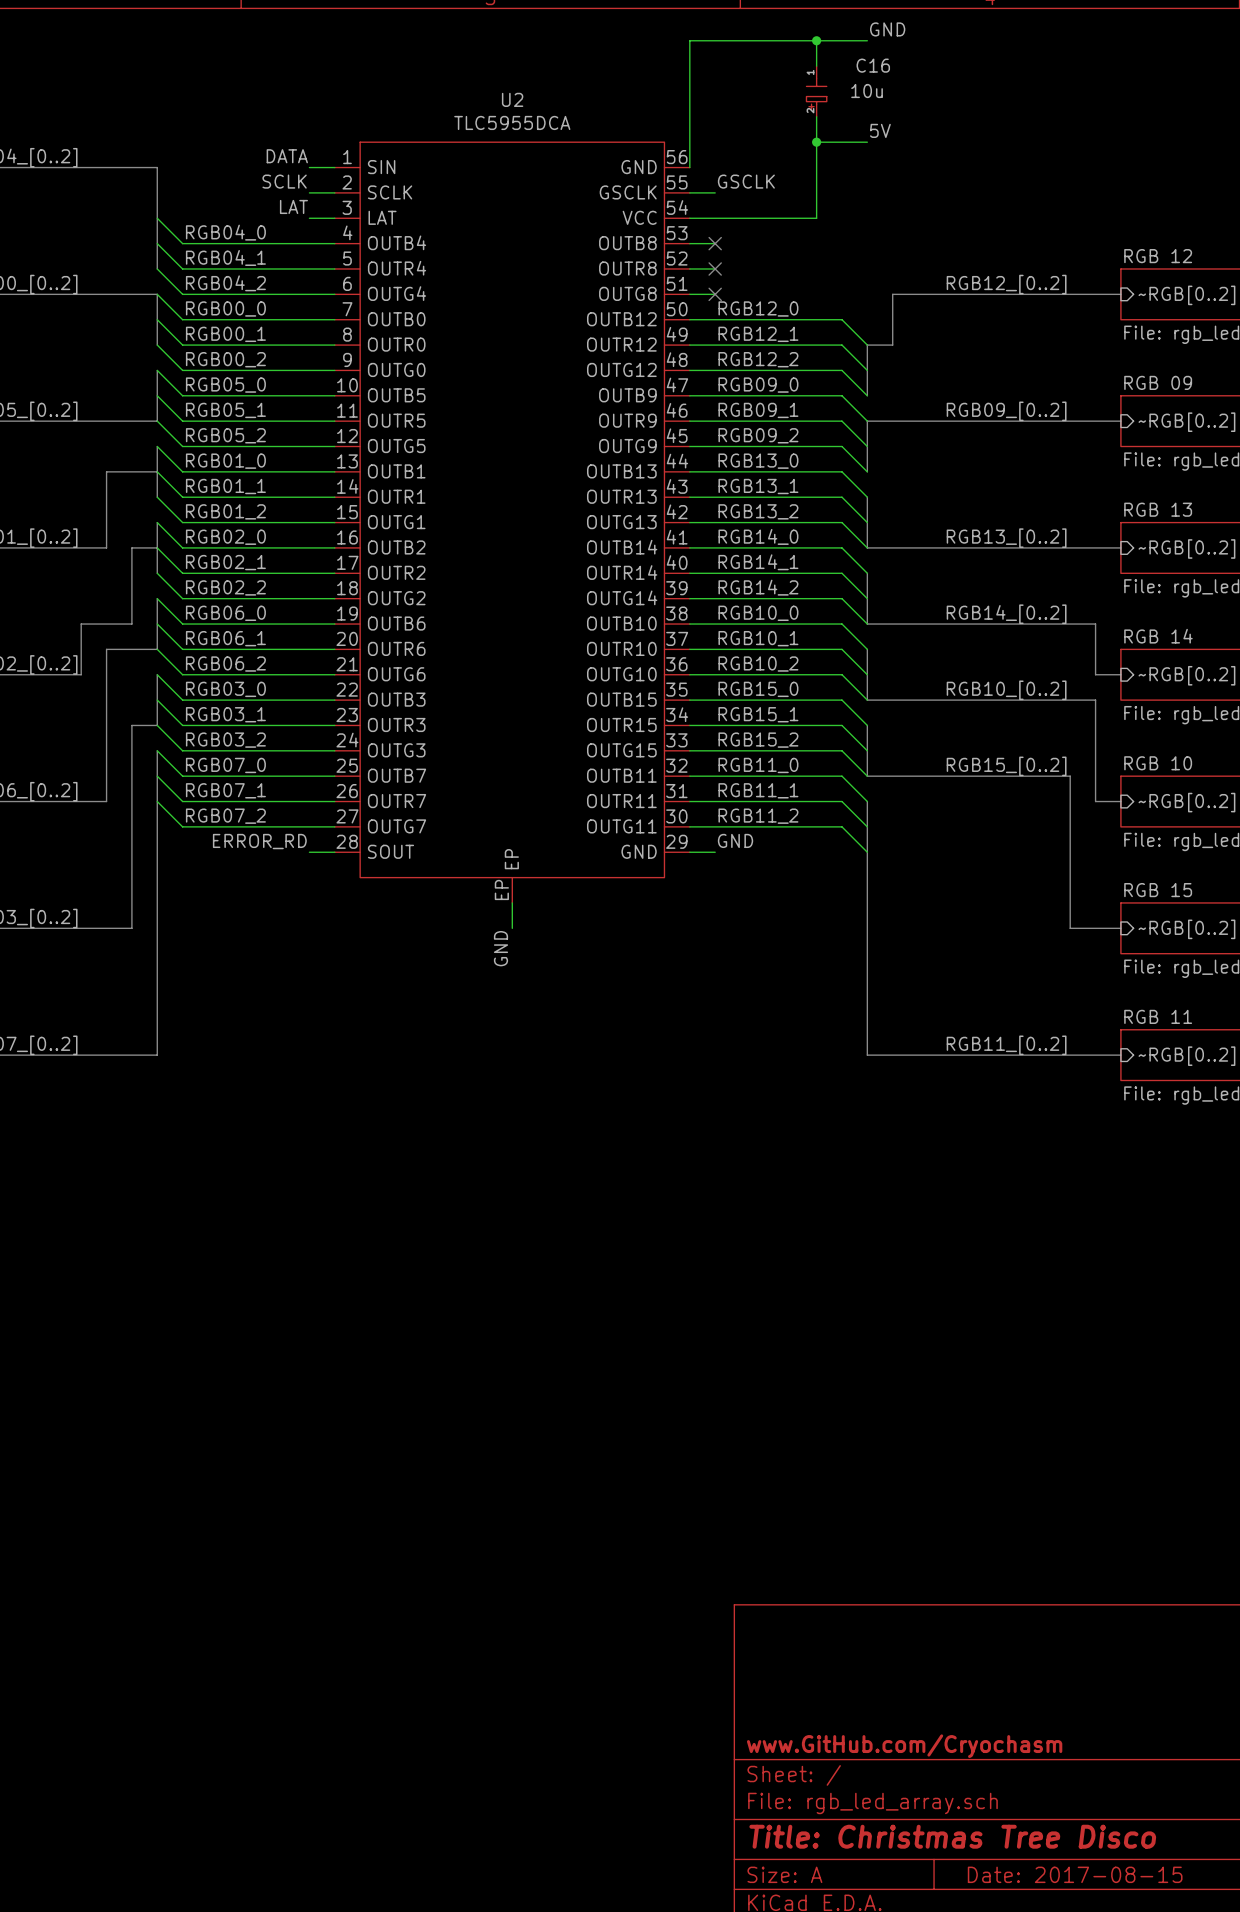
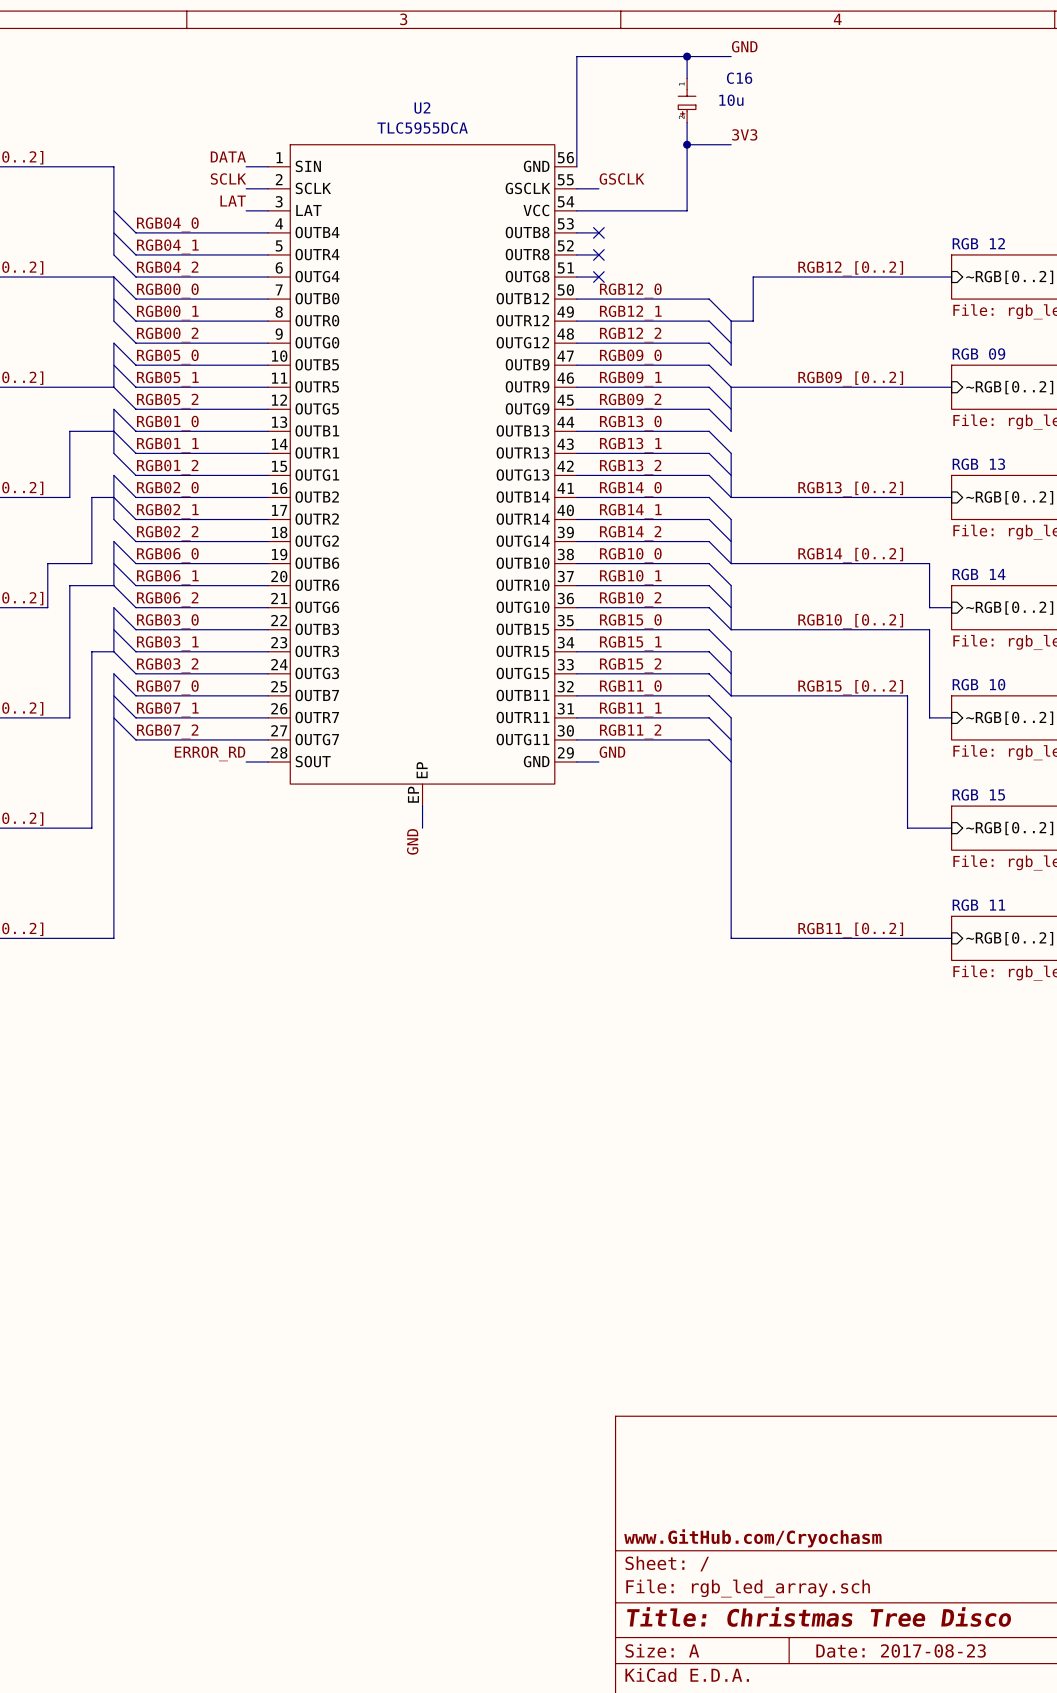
label: 5V (880, 130) -> 3V3 (744, 134)
title block: Date: 2017-08-15 (1075, 1874) -> Date: 2017-08-23 (901, 1650)

